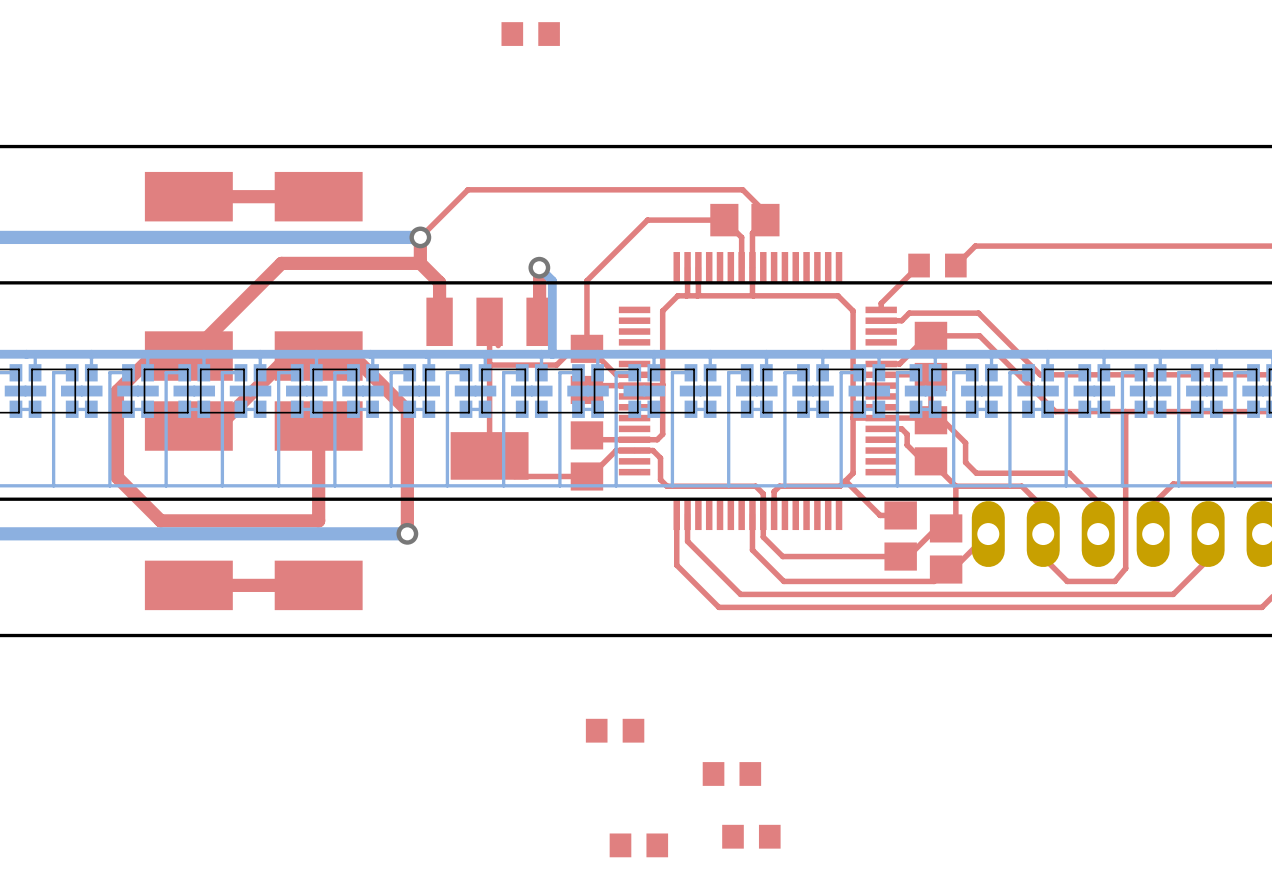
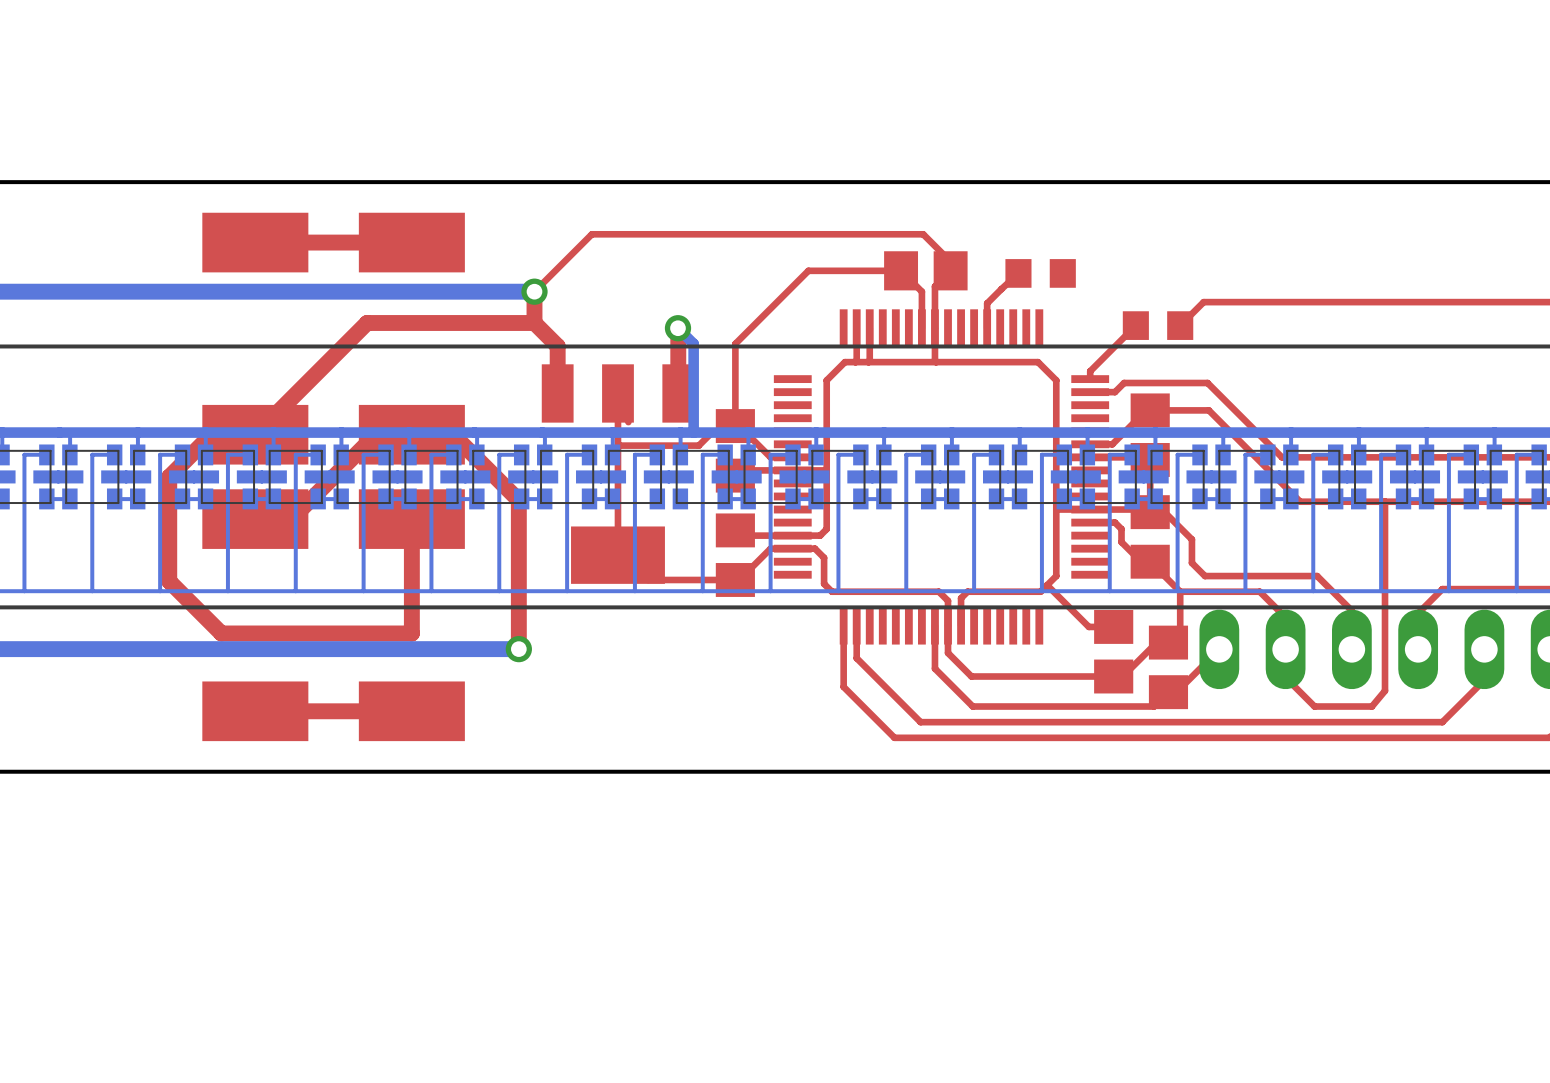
part: (530, 34) -> none
top track: none -> (1018, 273) (987, 303) (987, 328)
part: none -> (1040, 273)
part: (615, 730) -> none
part: (731, 773) -> none
part: (751, 836) -> none
part: (638, 845) -> none

